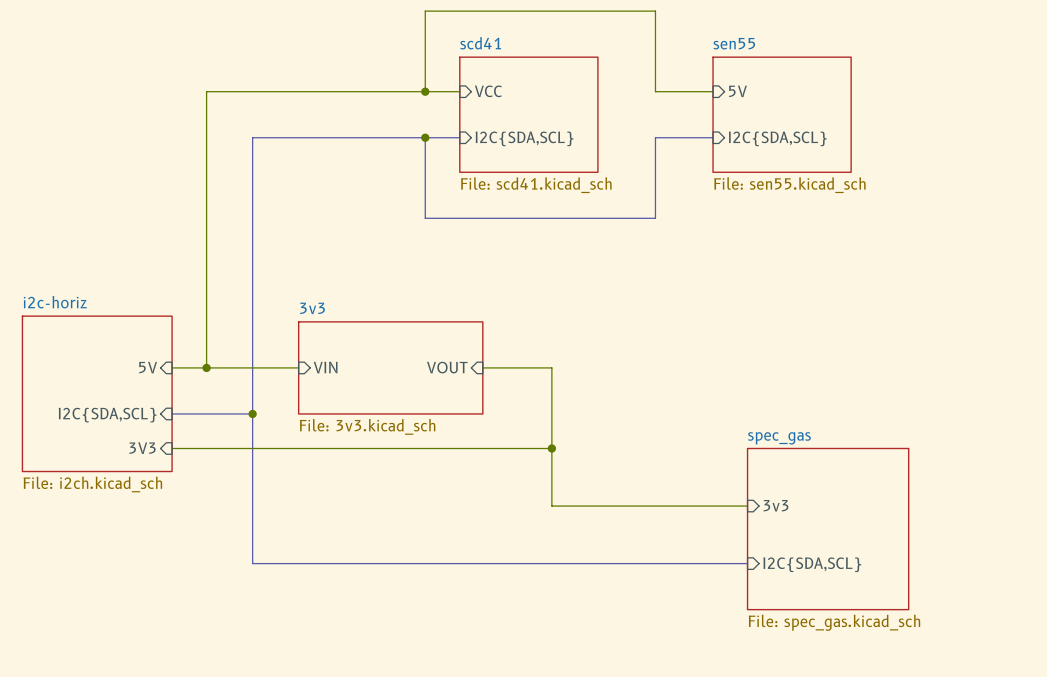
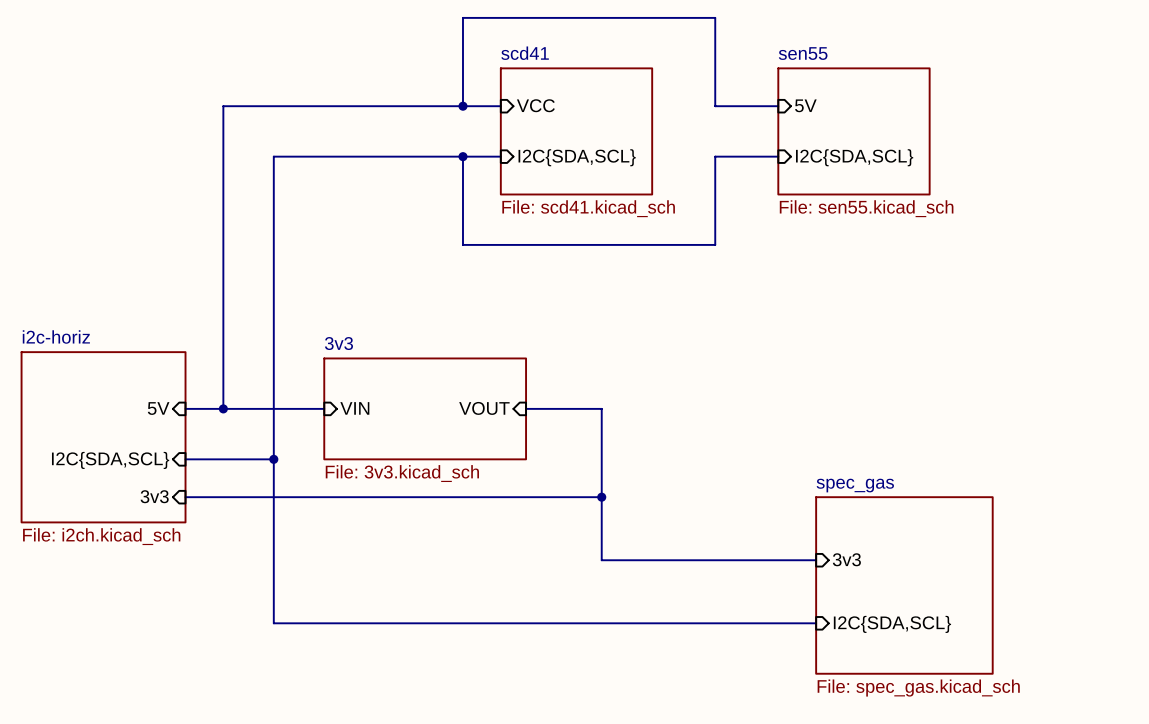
sheet pin: 3V3 (142, 448) -> 3v3 (154, 496)

